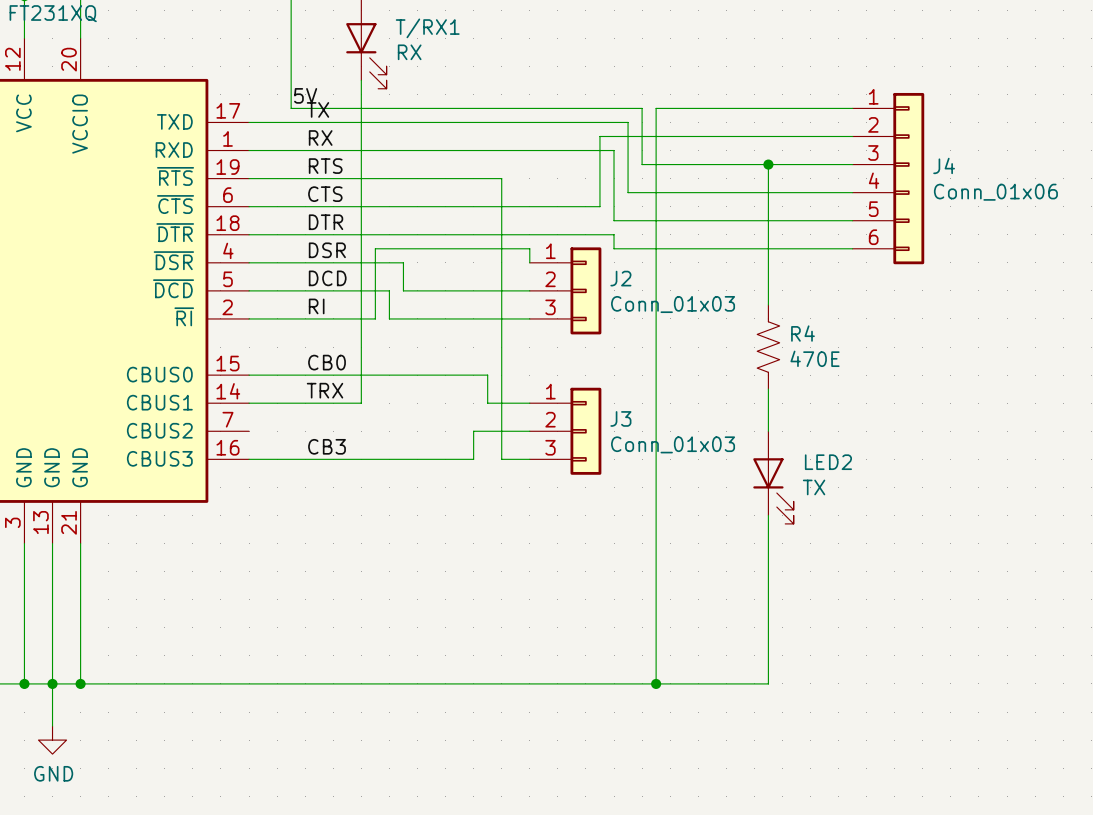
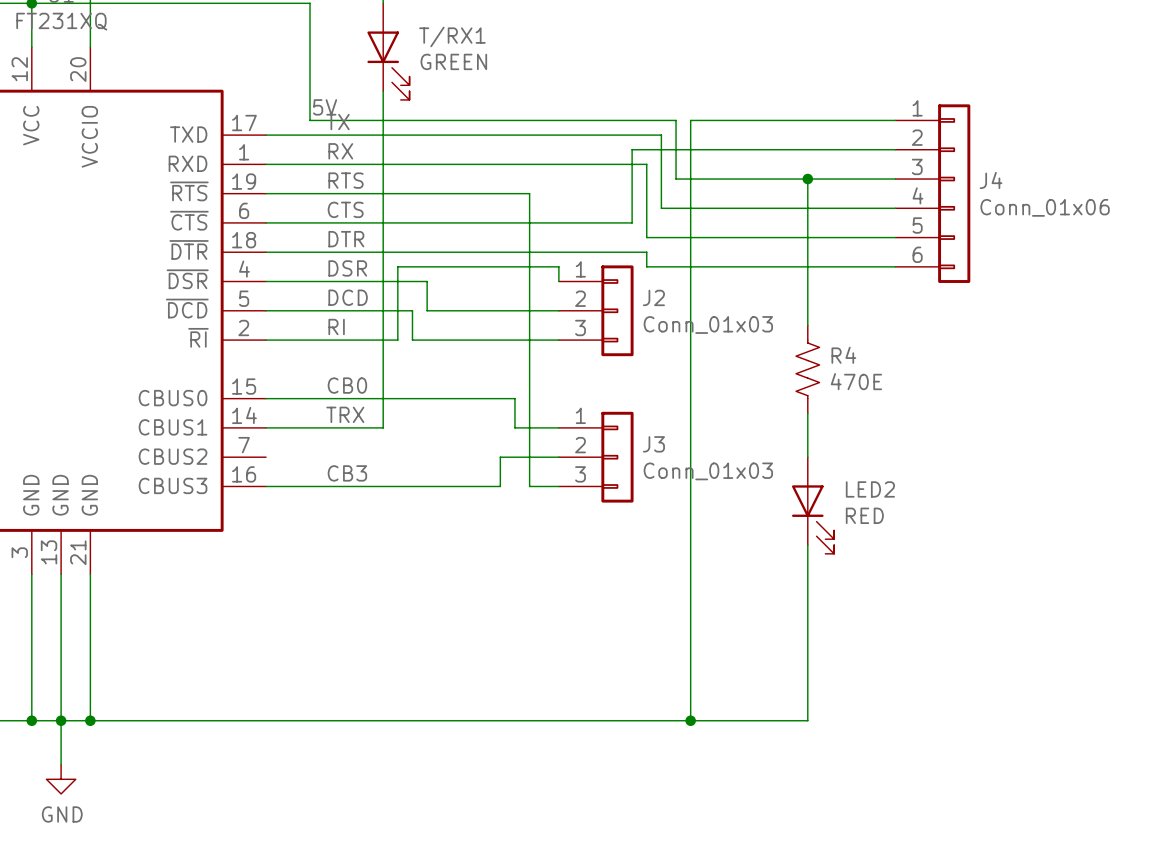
T/RX1 value: RX (409, 52) -> GREEN (453, 61)
LED2 value: TX (814, 487) -> RED (864, 515)

